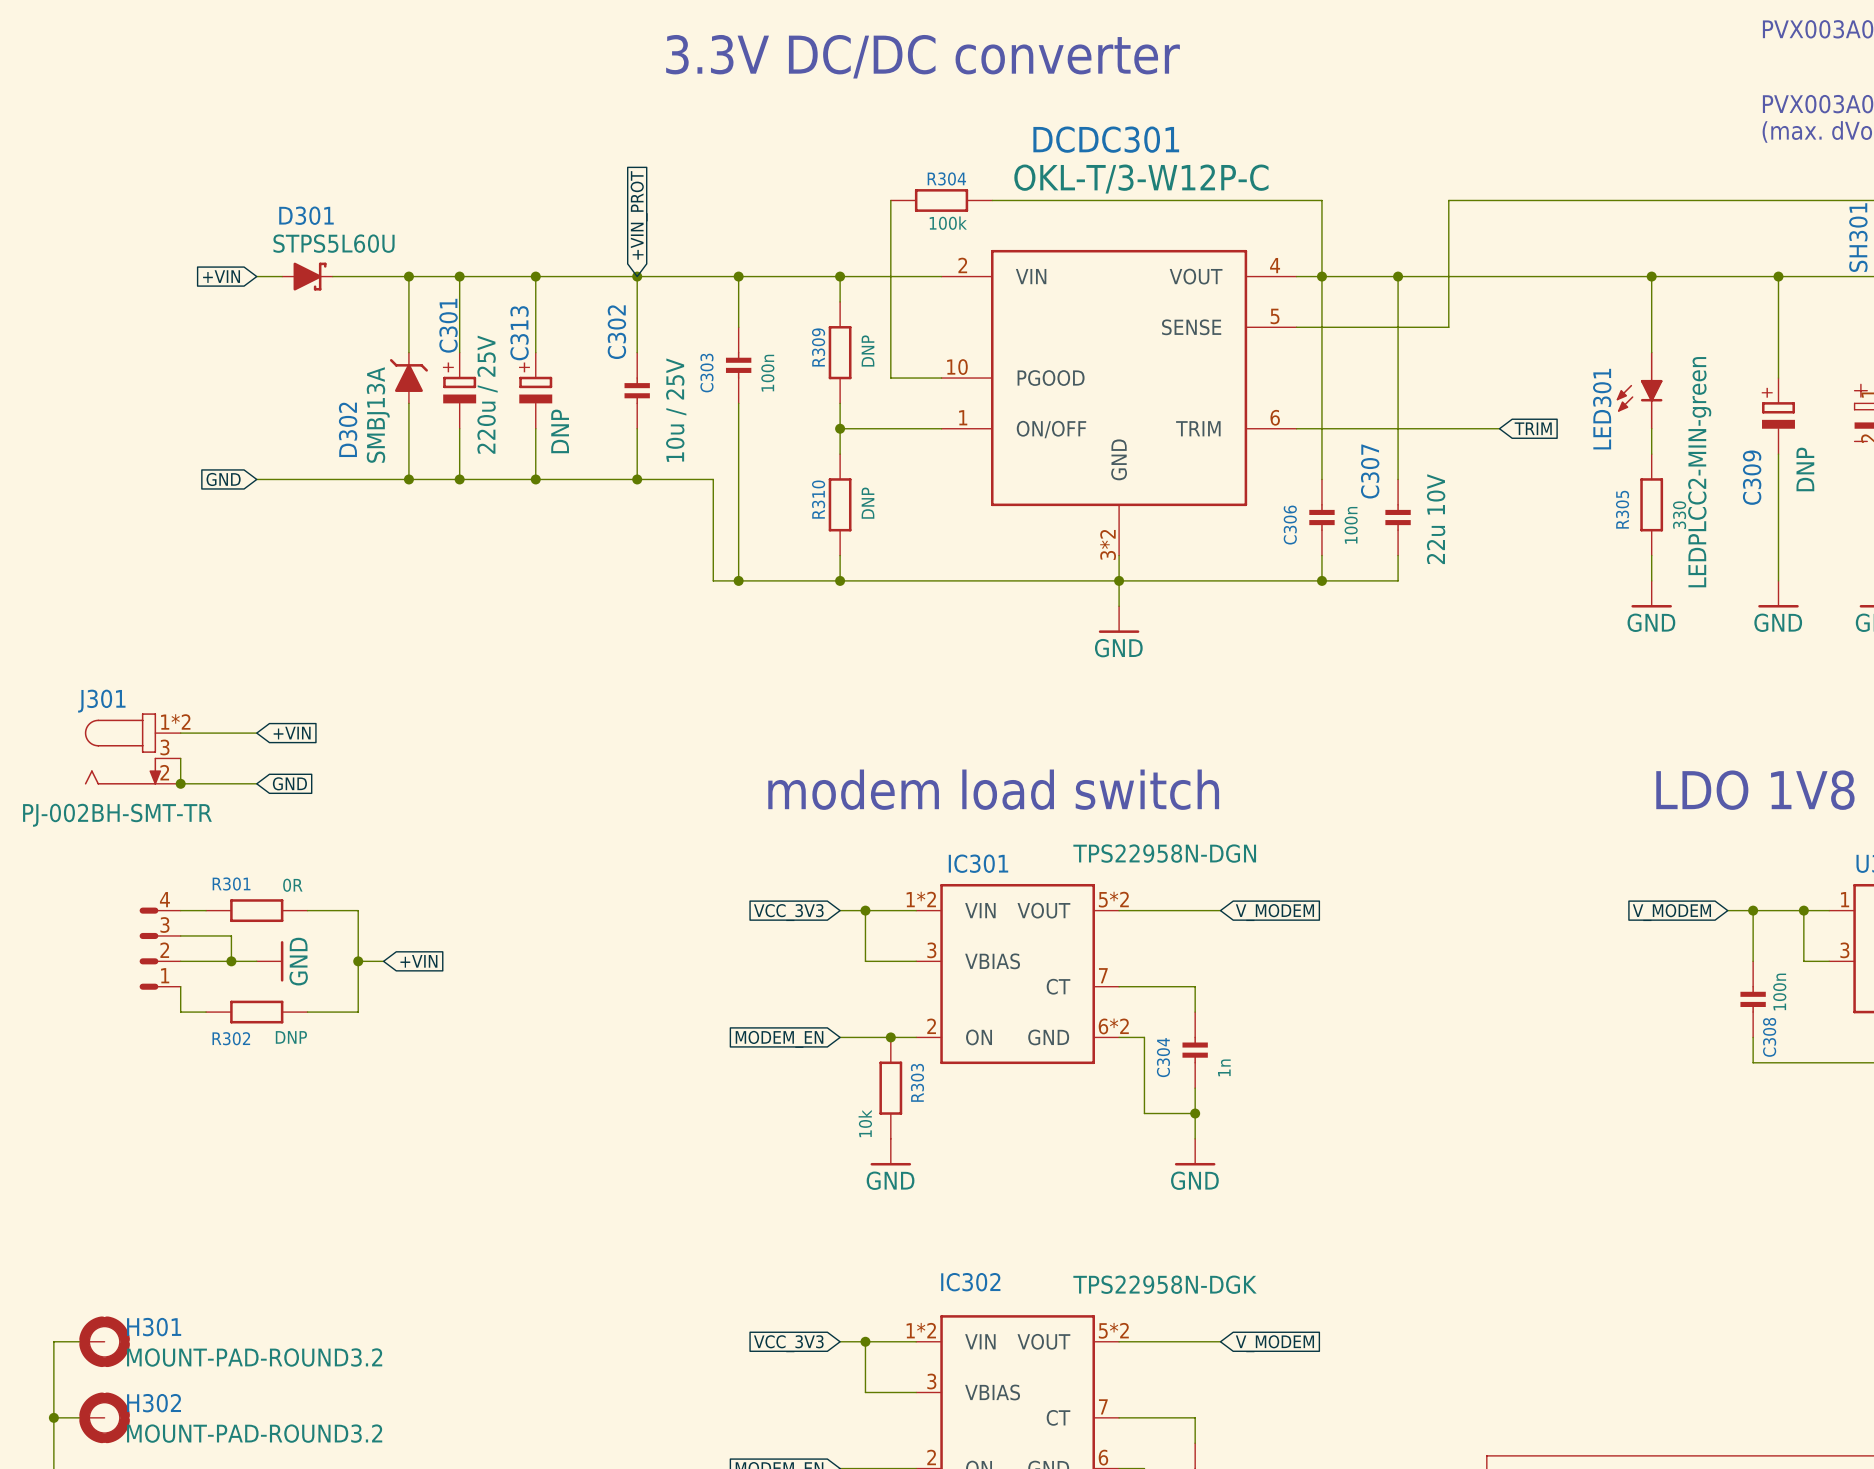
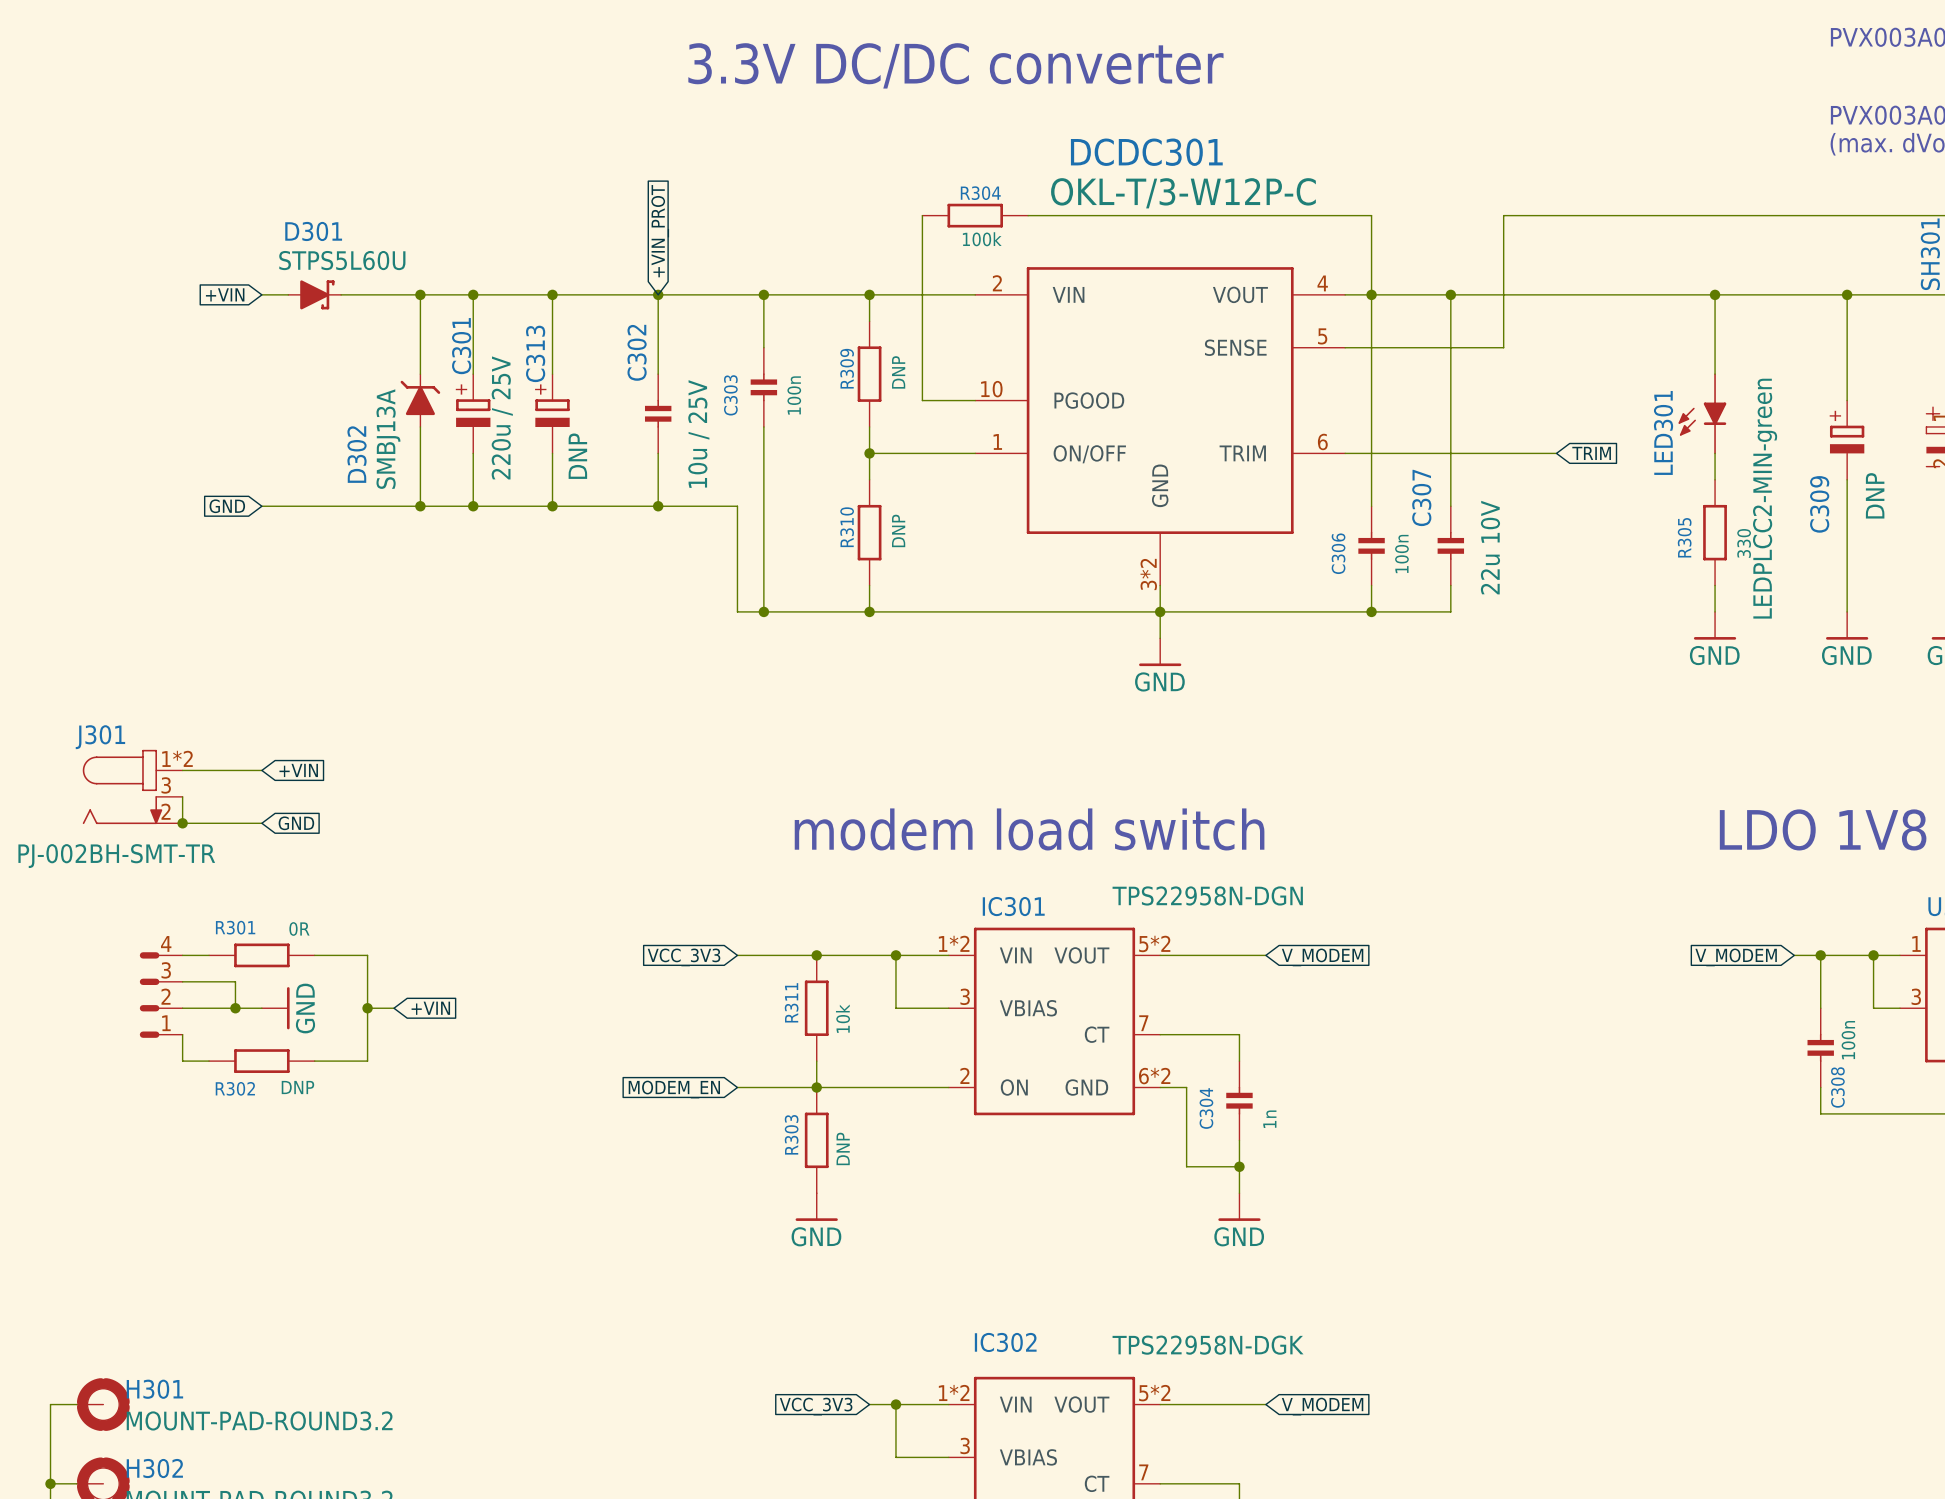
wire: none -> (737, 955) (869, 955)
junction: none -> (816, 955)
global label position: VCC_3V3 (788, 912) -> VCC_3V3 (684, 957)
R311: none -> 10k (816, 1008)
wire: none -> (816, 1061) (816, 1087)
wire: none -> (737, 1087) (869, 1087)
junction: none -> (816, 1087)
junction: (890, 1037) -> none
global label position: MODEM_EN (779, 1039) -> MODEM_EN (674, 1089)
R303 name position: R303 (917, 1082) -> R303 (791, 1134)
R303 position: (890, 1088) -> (816, 1140)
R303 value: 10k (865, 1123) -> DNP (843, 1148)
power symbol position: GND (890, 1152) -> GND (816, 1207)

